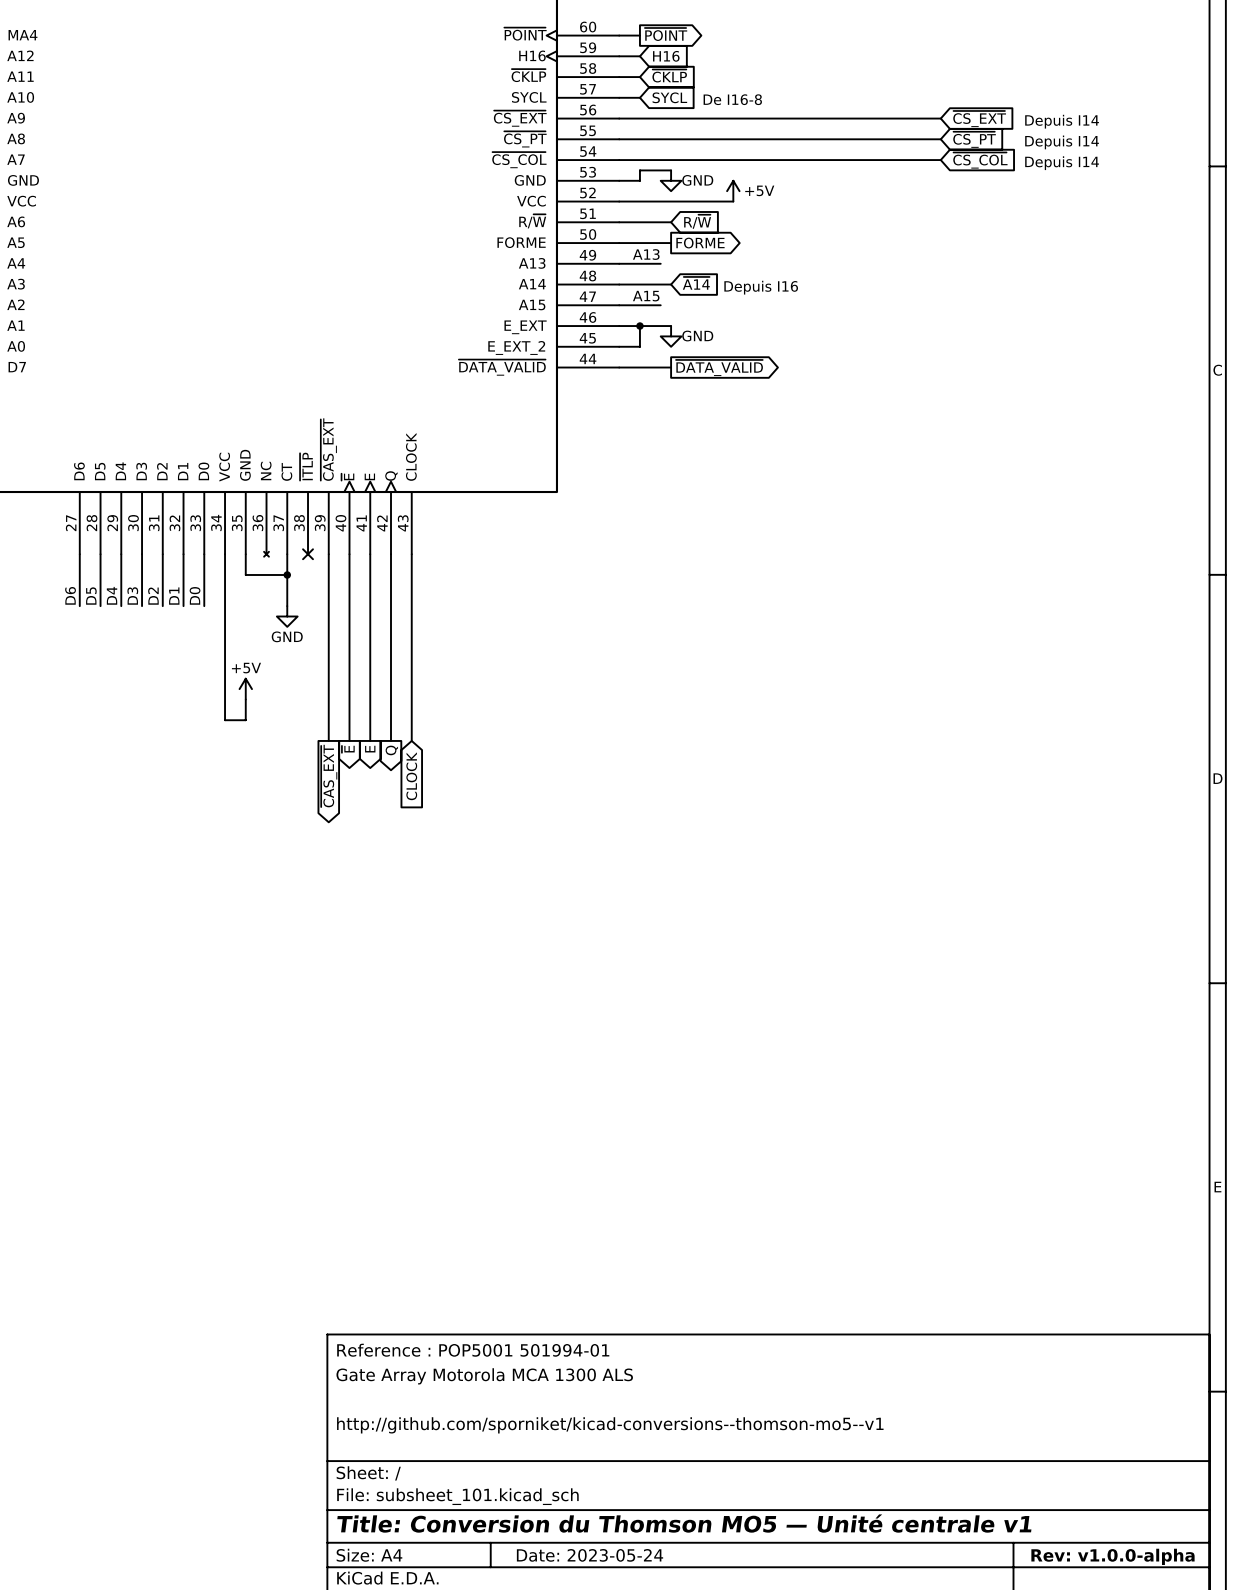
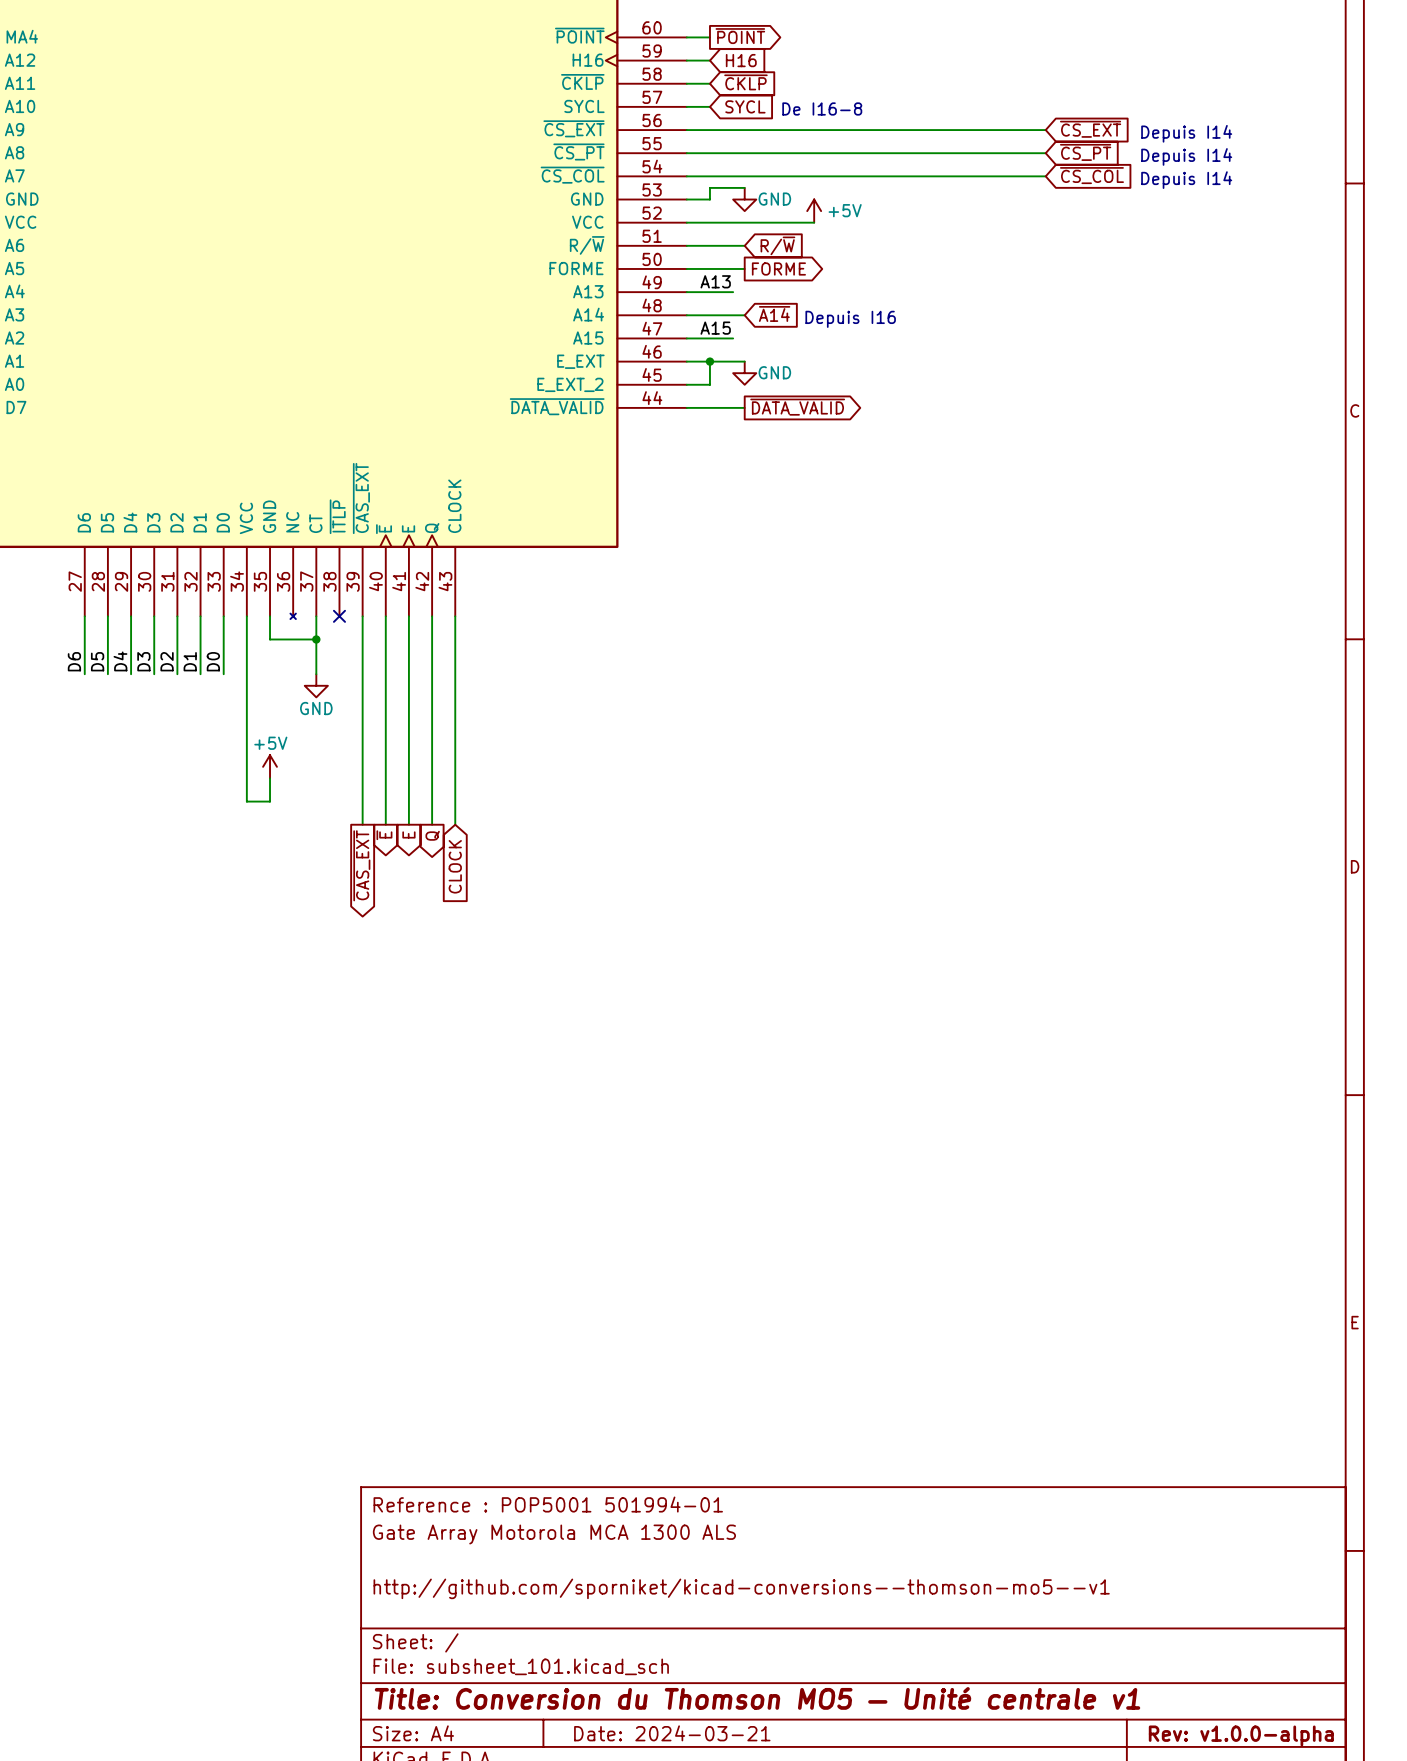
title block: Date: 2023-05-24 (590, 1555) -> Date: 2024-03-21 (672, 1733)

